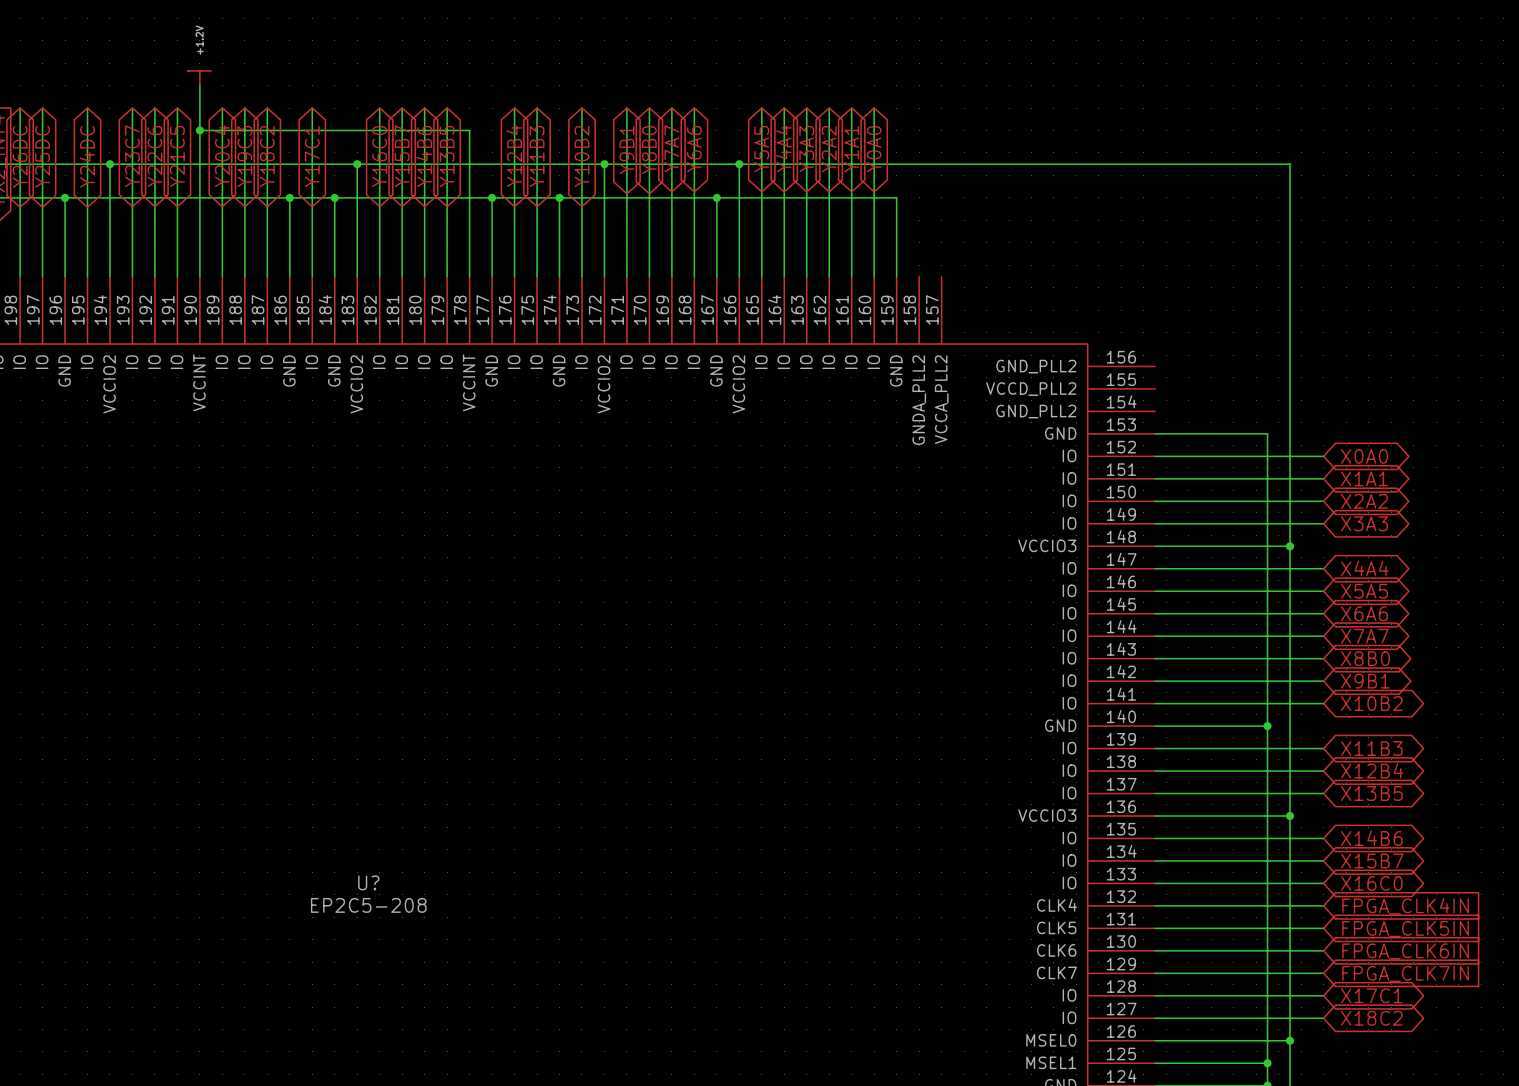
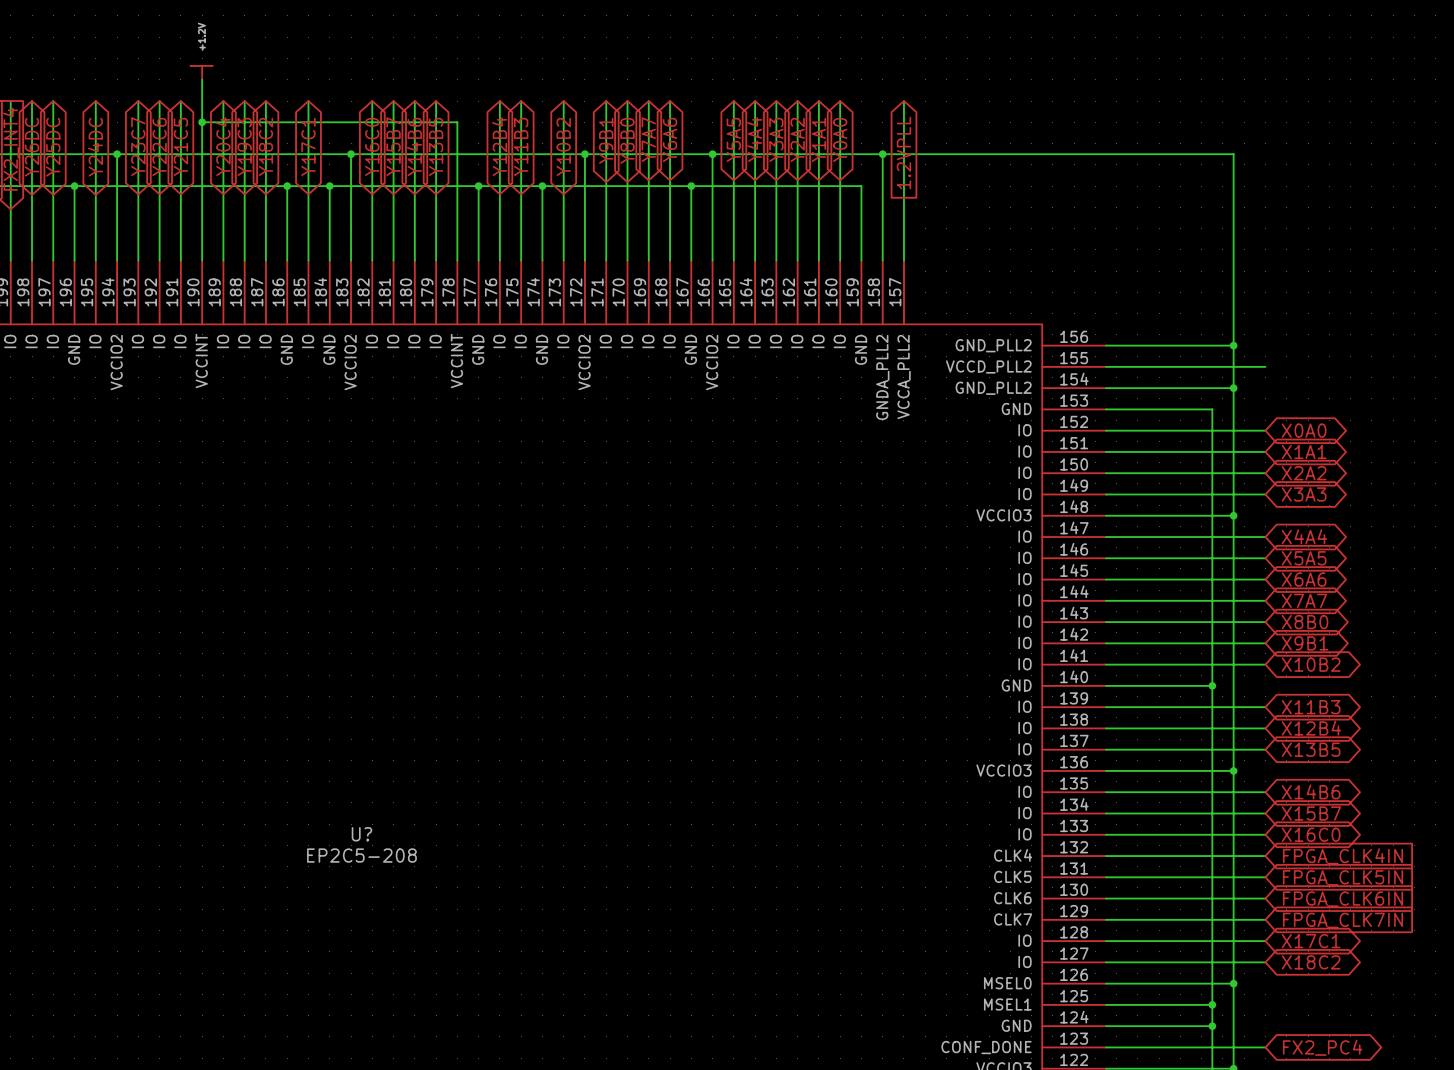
wire: none -> (903, 101) (903, 260)
global label: none -> 1.2VPLL (903, 152)
wire: none -> (882, 154) (882, 260)
junction: none -> (882, 154)
wire: none -> (1106, 345) (1233, 345)
junction: none -> (1233, 345)
wire: none -> (1106, 366) (1265, 366)
wire: none -> (1106, 388) (1233, 388)
junction: none -> (1233, 388)

